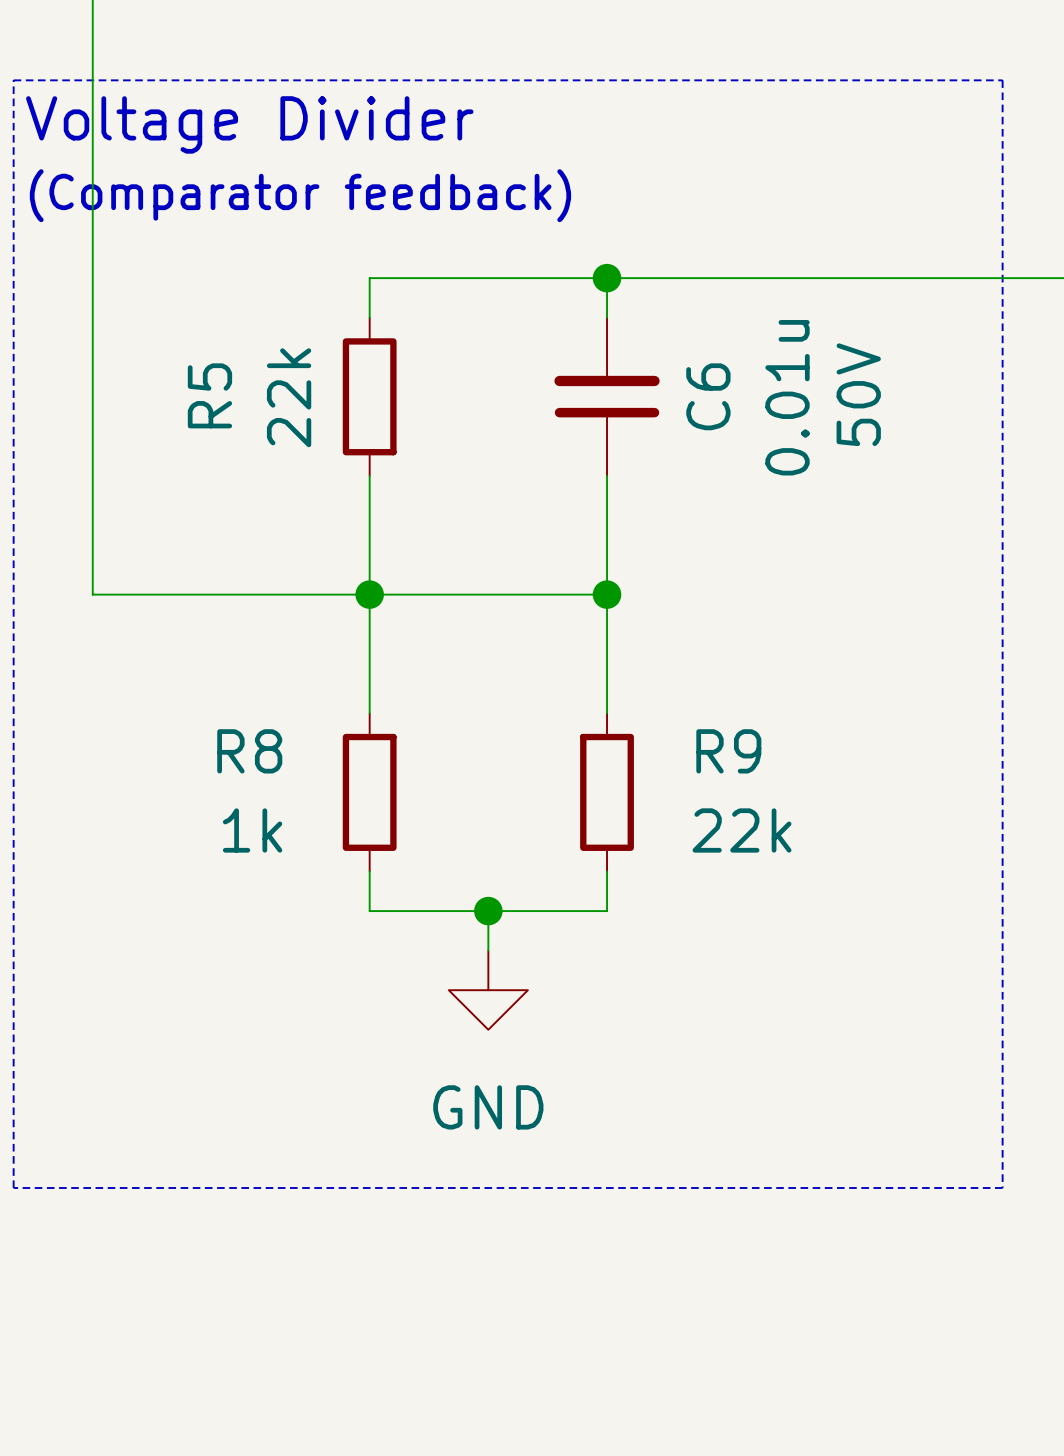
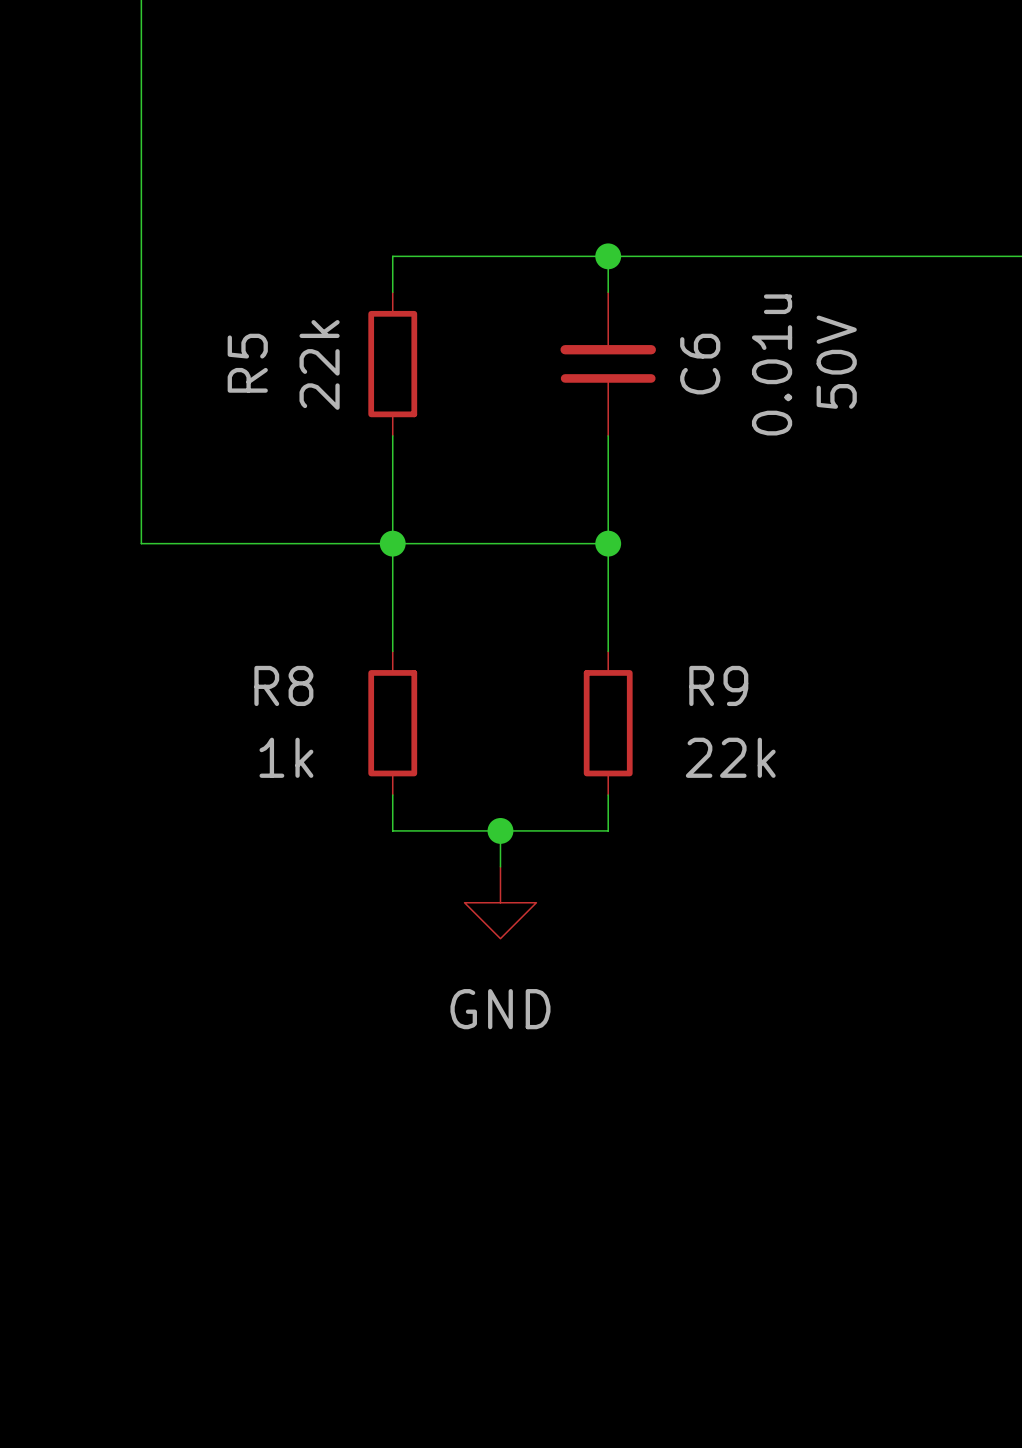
line: (13, 80) (1002, 80) (1002, 1187) (13, 1187) (13, 80) -> none
text: Voltage Divider (249, 124) -> none
text: (Comparator feedback) (300, 195) -> none

